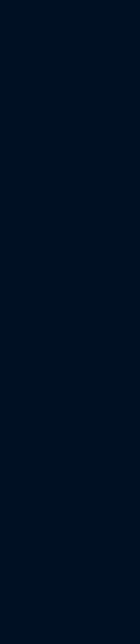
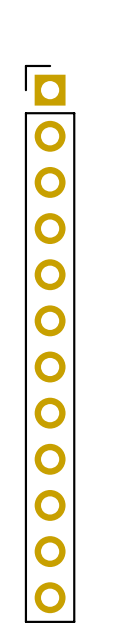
part: none -> (50, 343)

